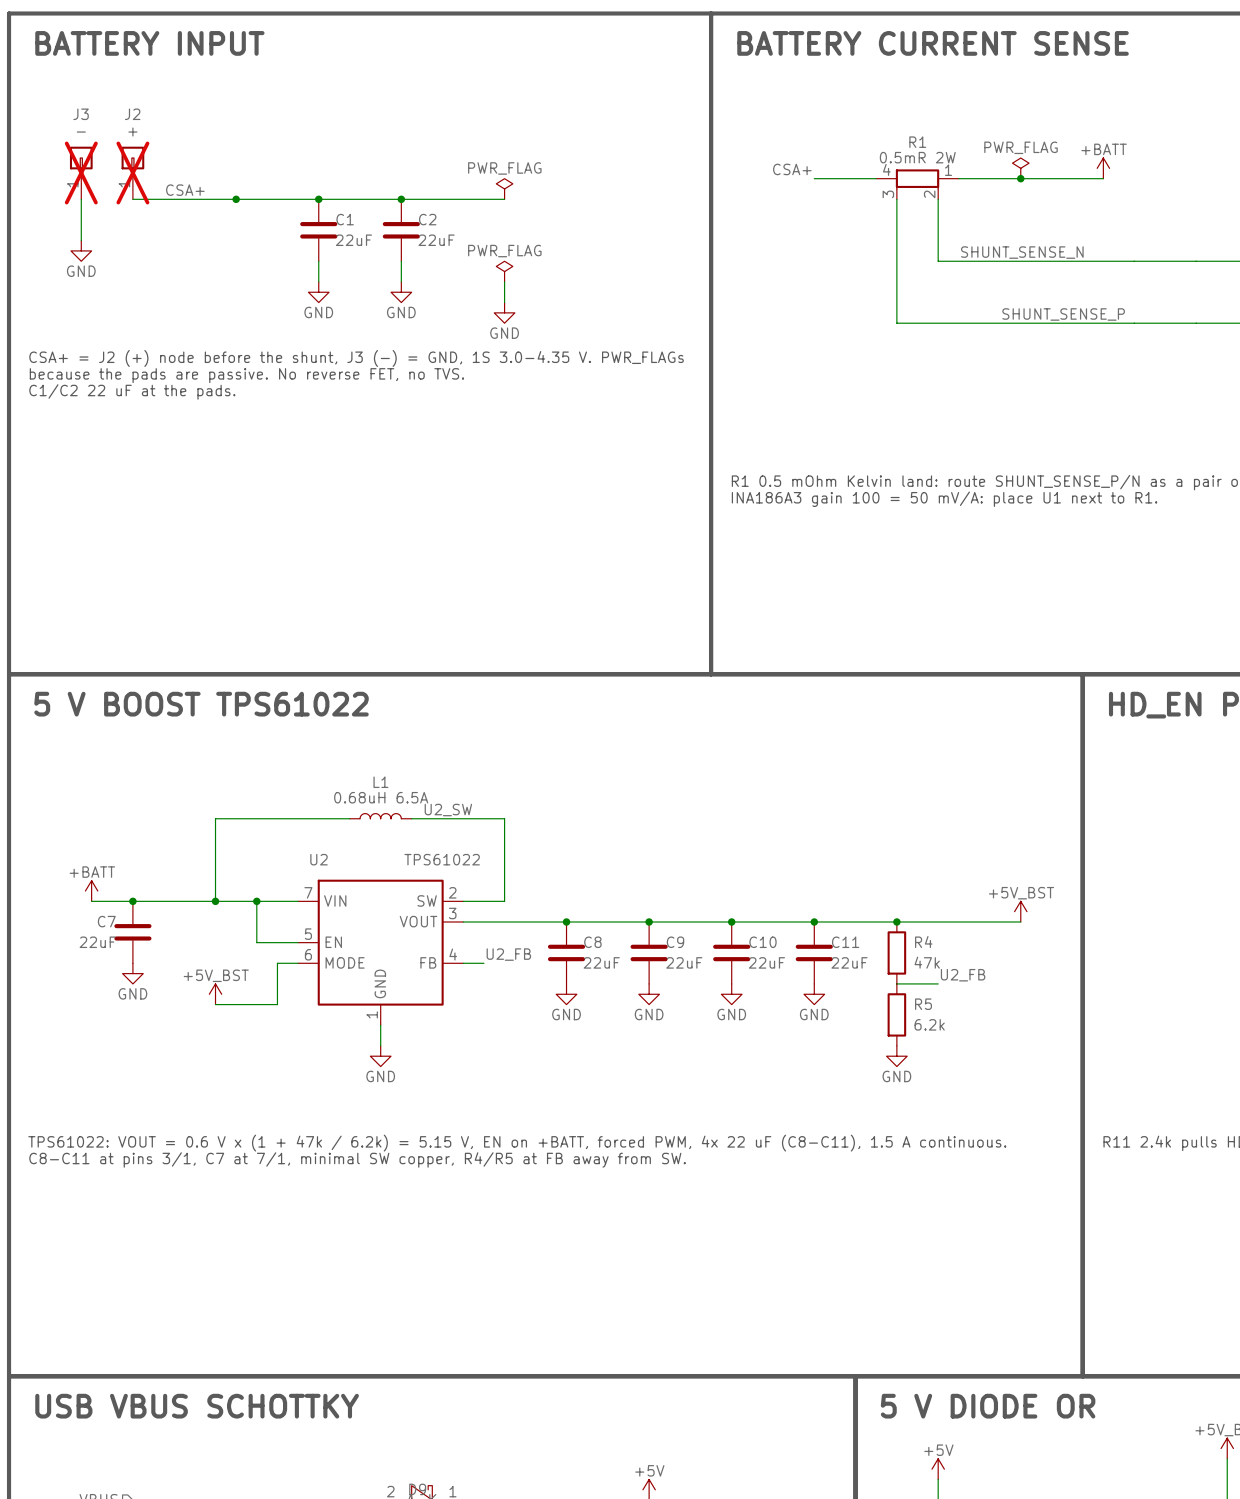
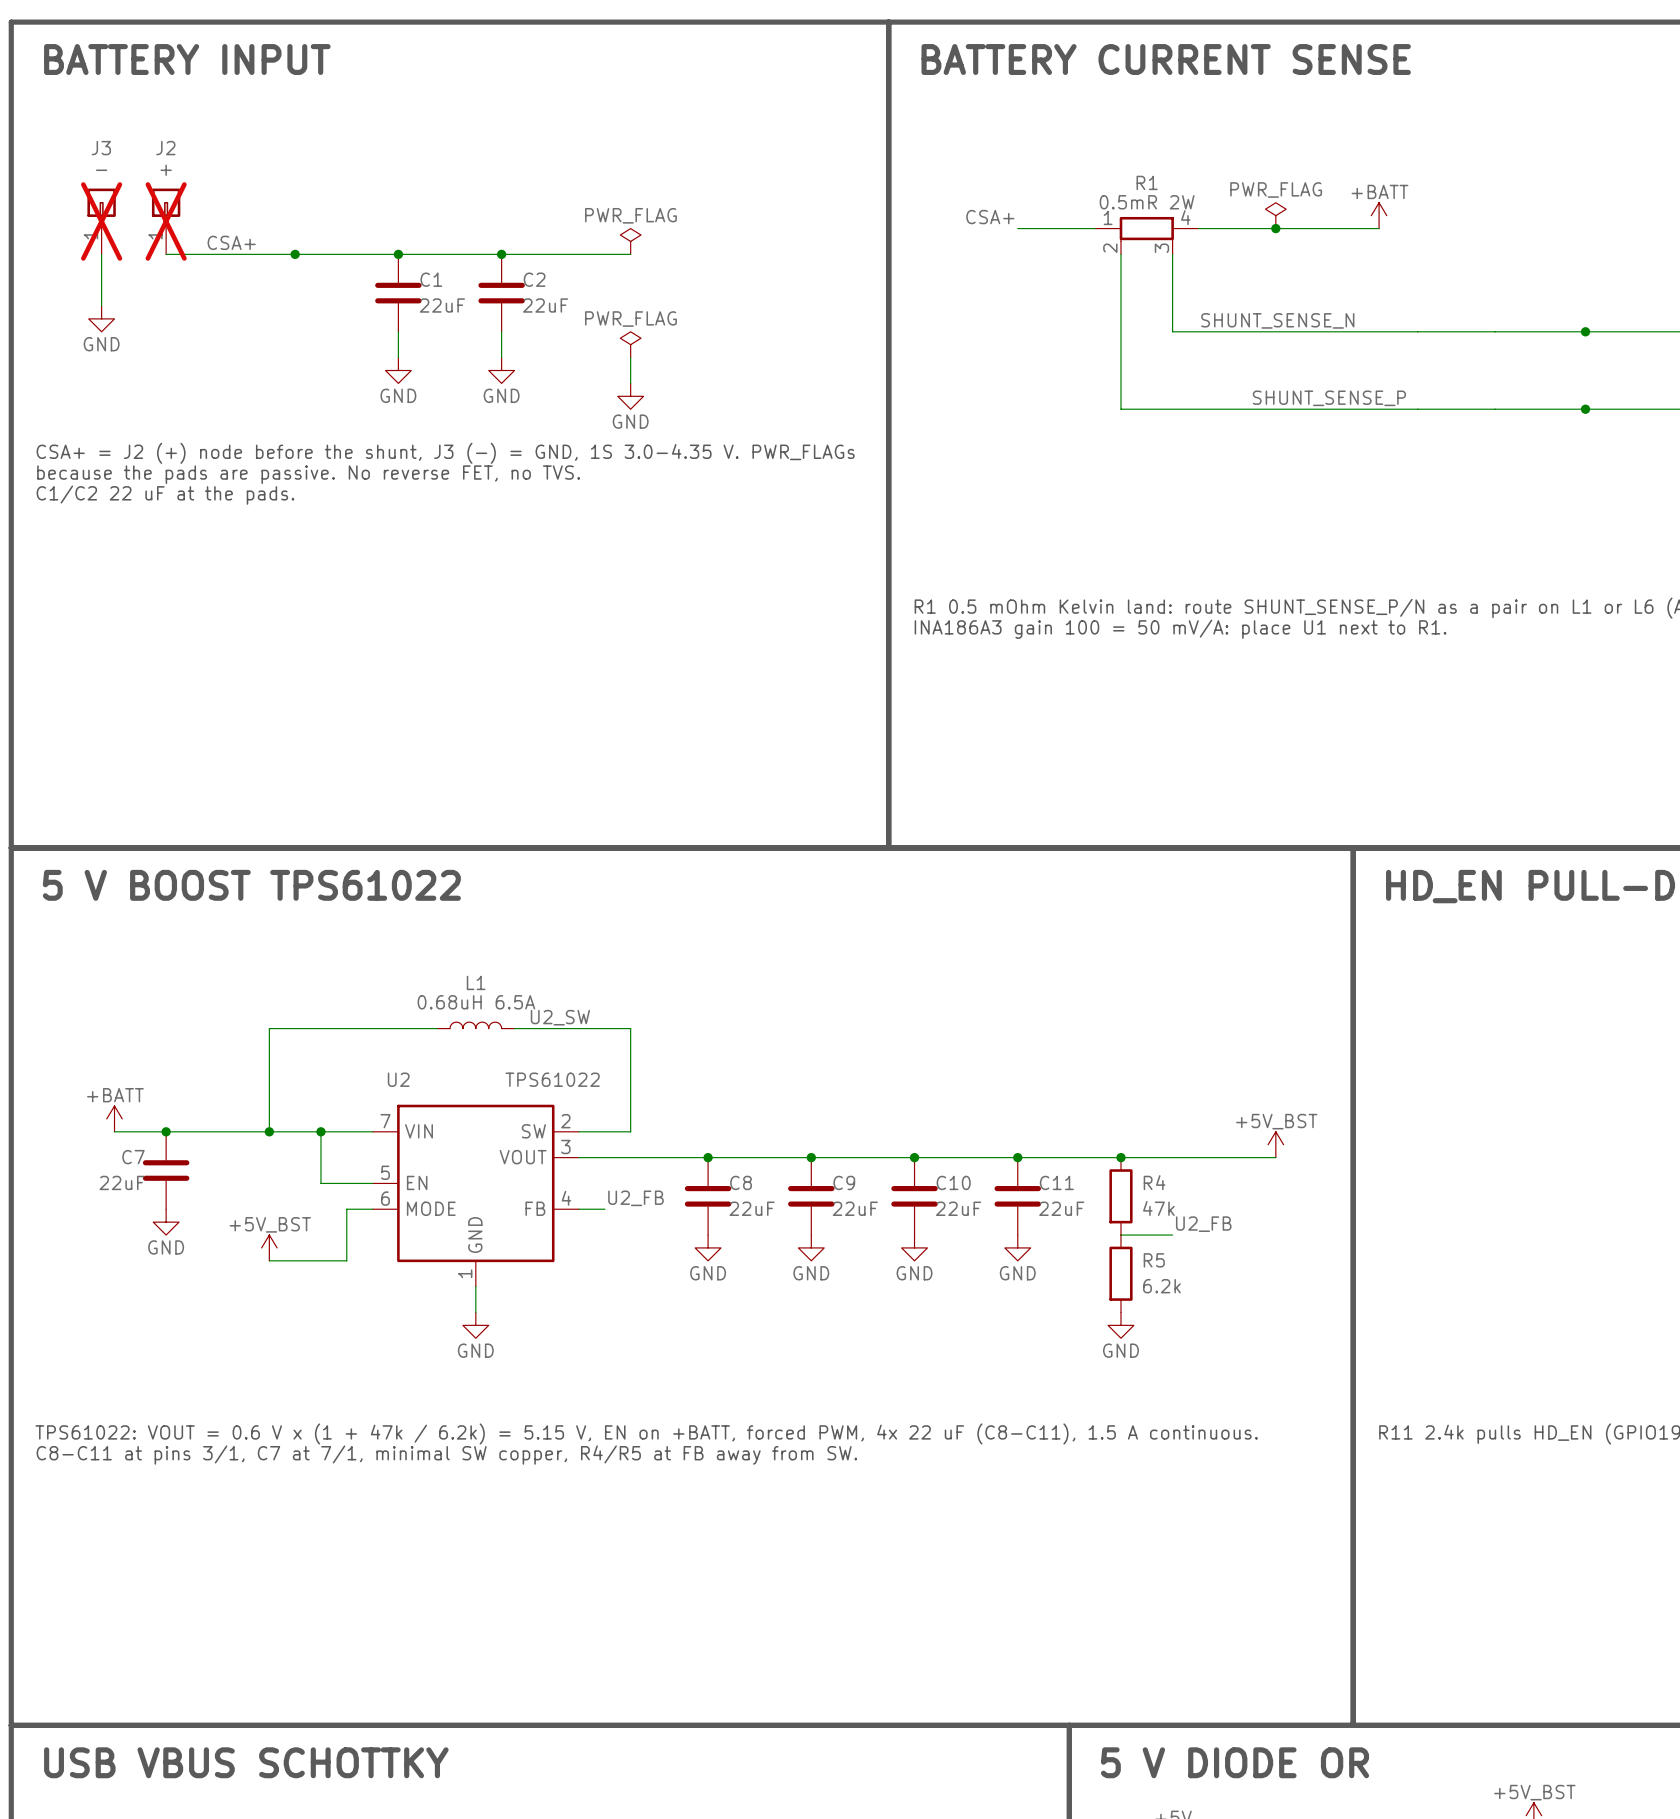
R1 flip: as is (917, 179) -> left-right (1146, 229)

